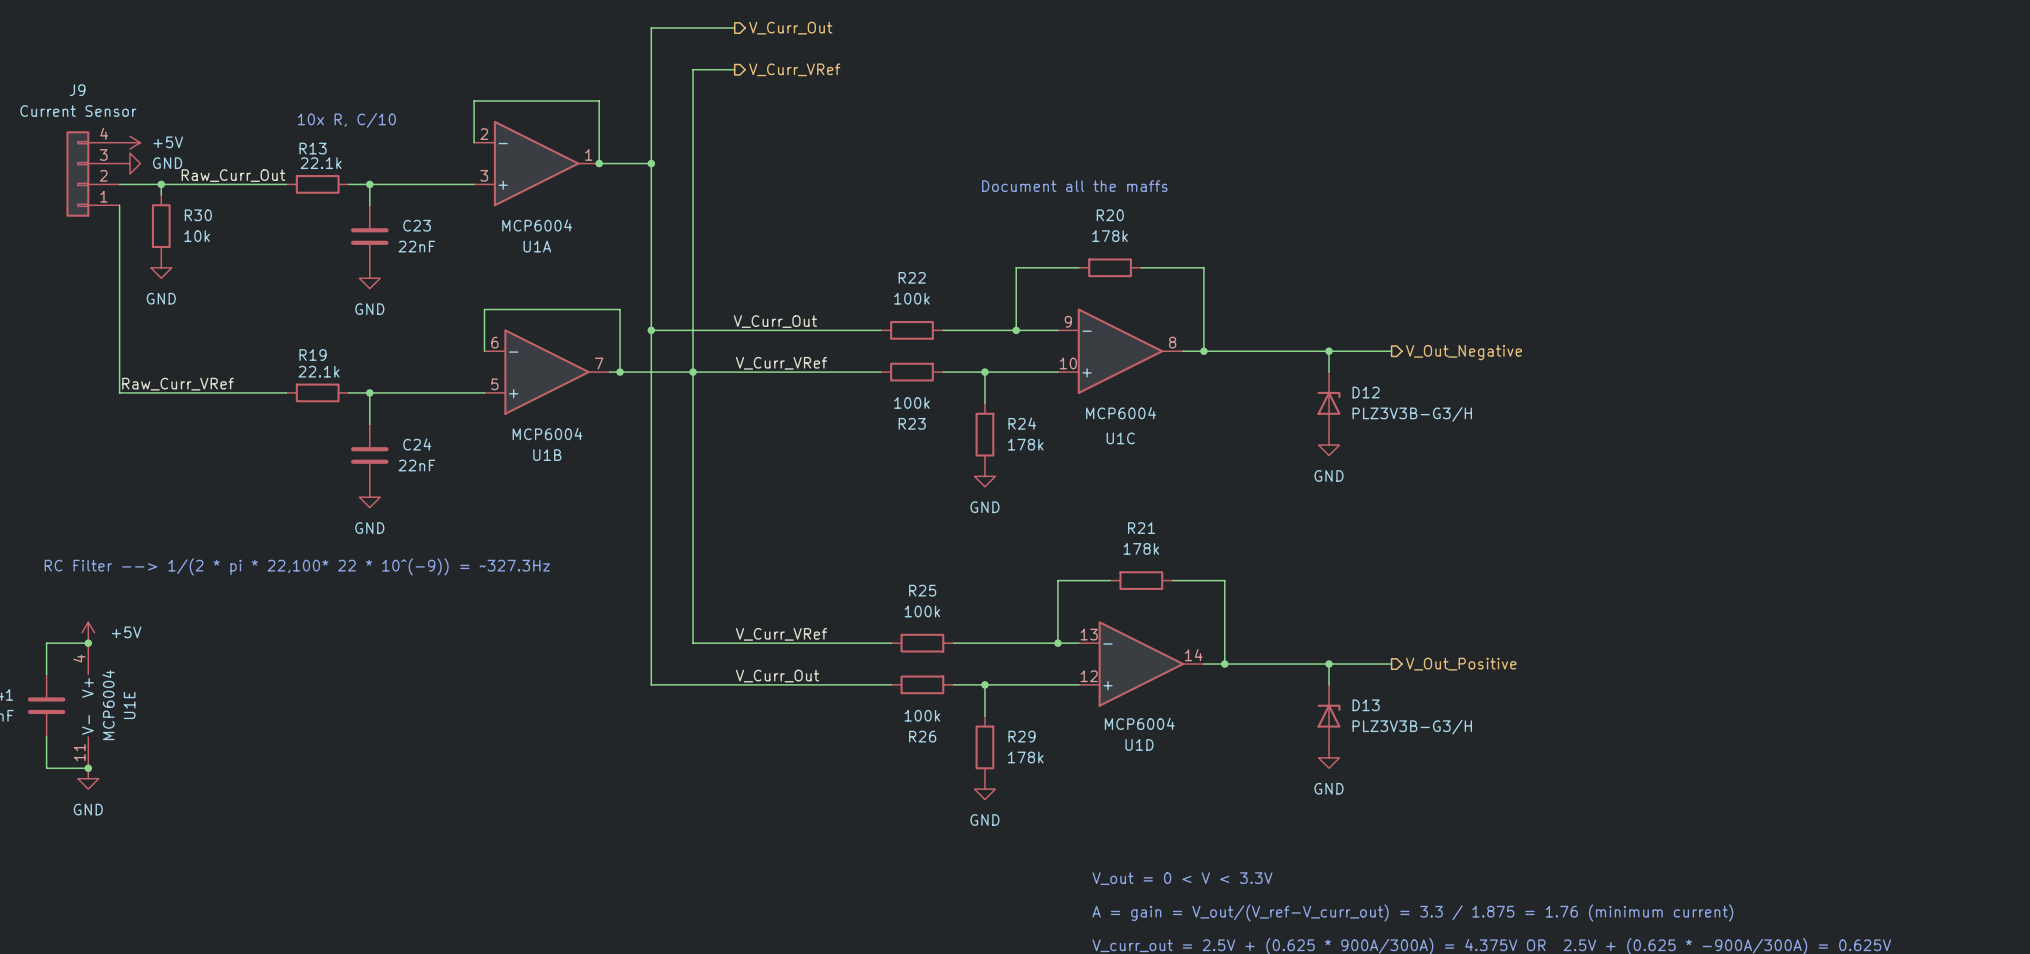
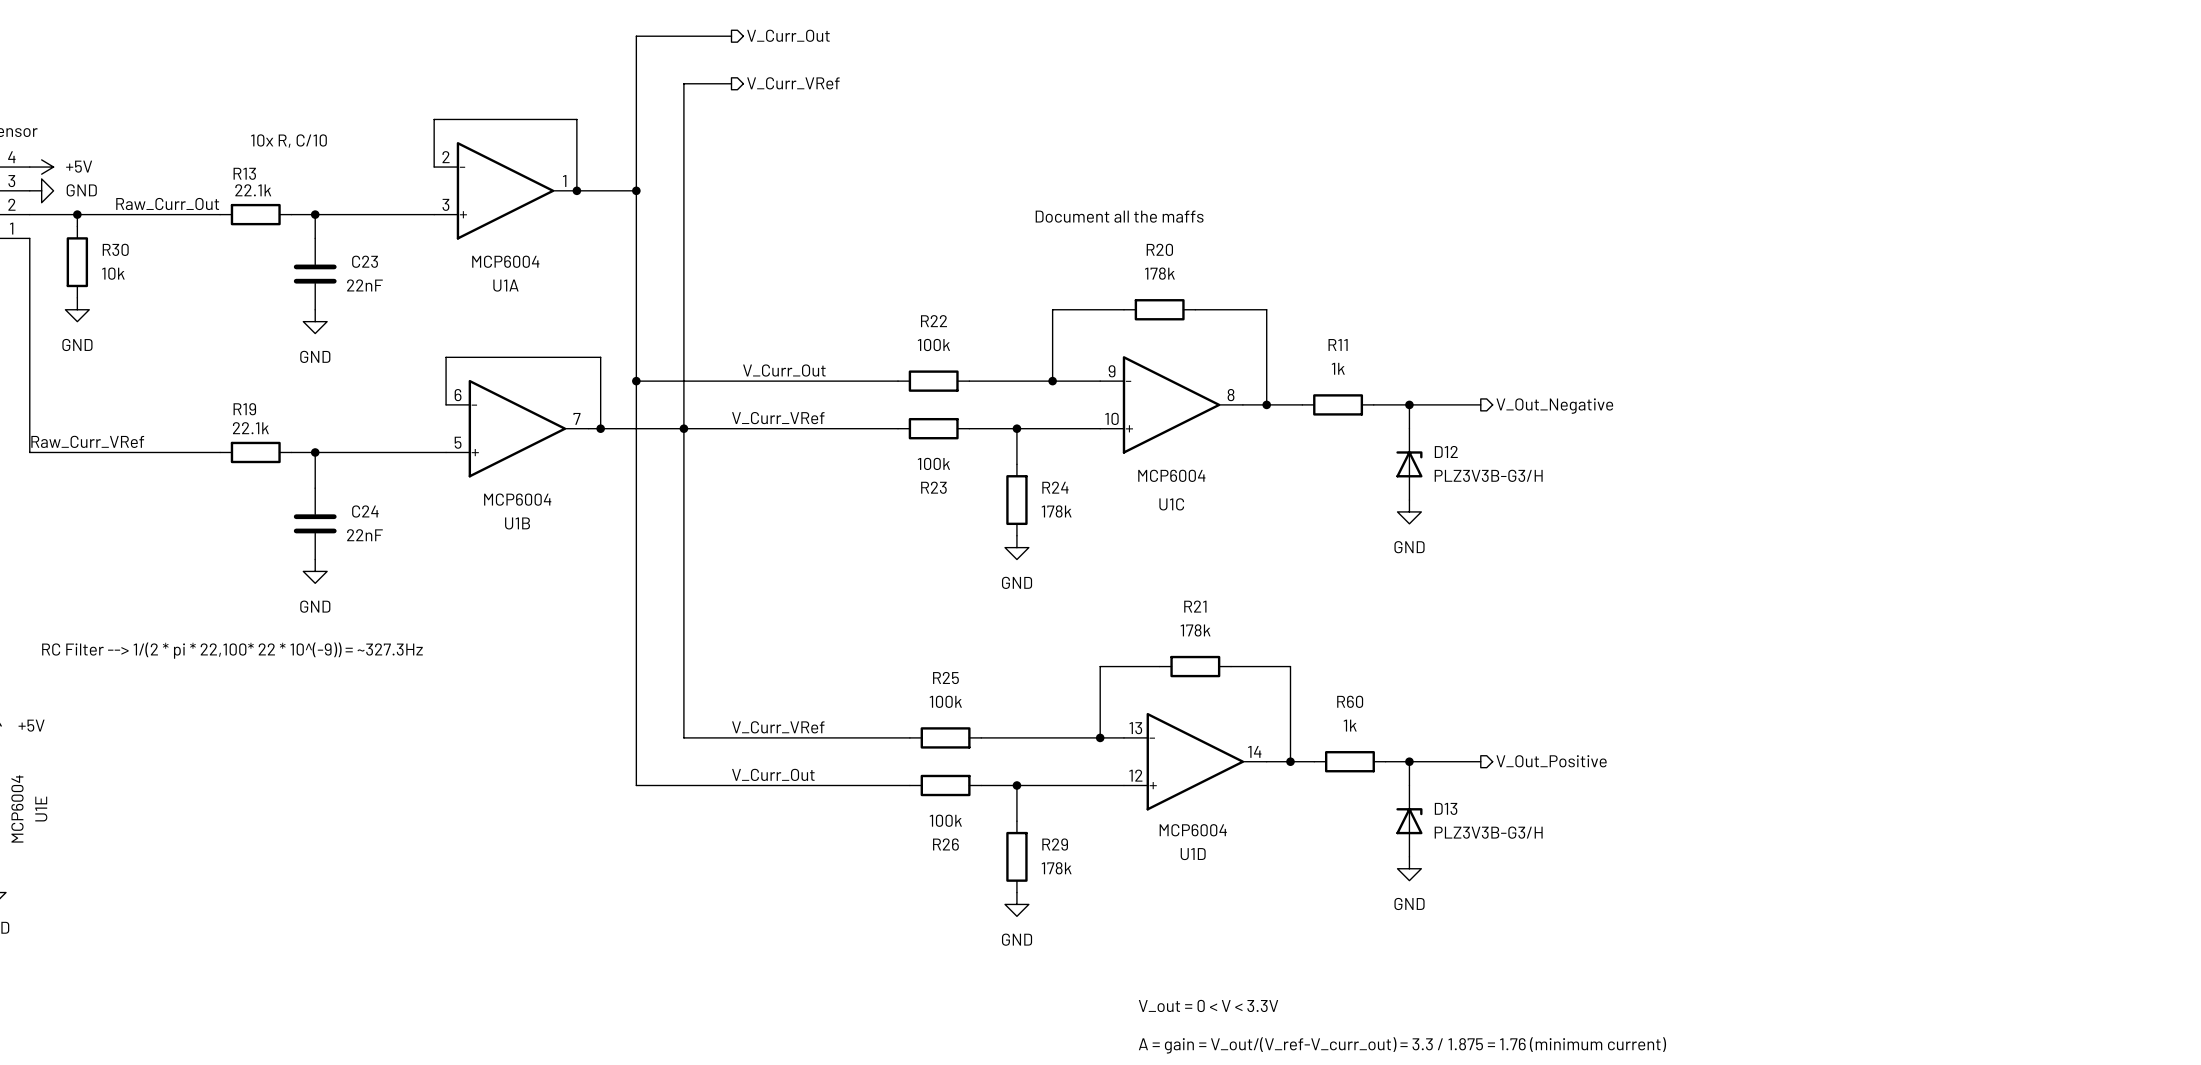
wire: (1235, 351) (1297, 351) -> none
R11: none -> 1k (1338, 404)
wire: (1245, 664) (1308, 664) -> none
R60: none -> 1k (1349, 761)

